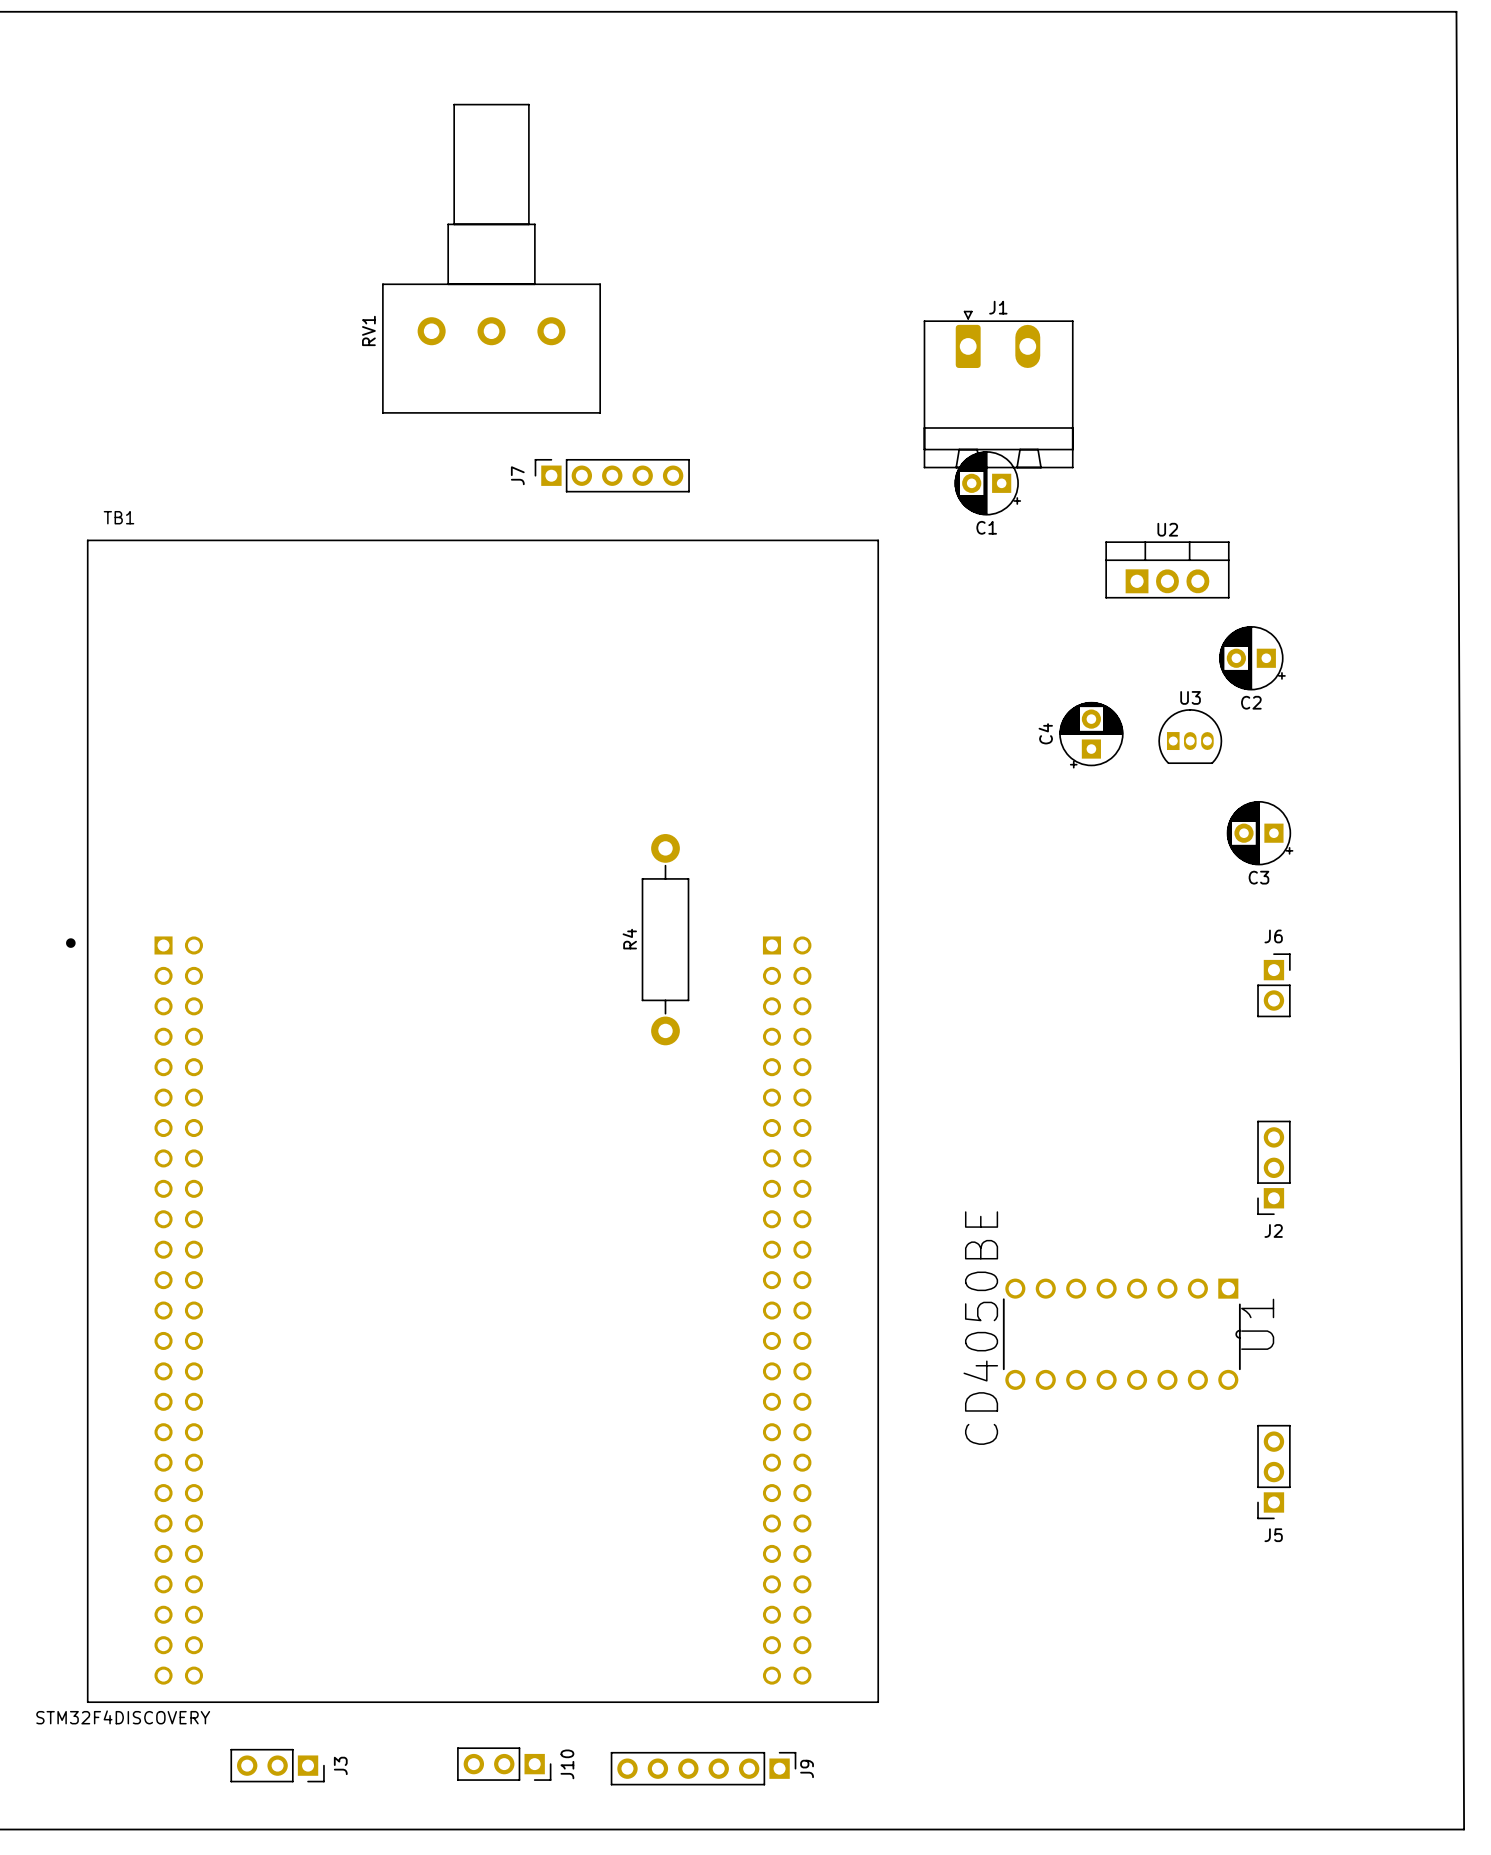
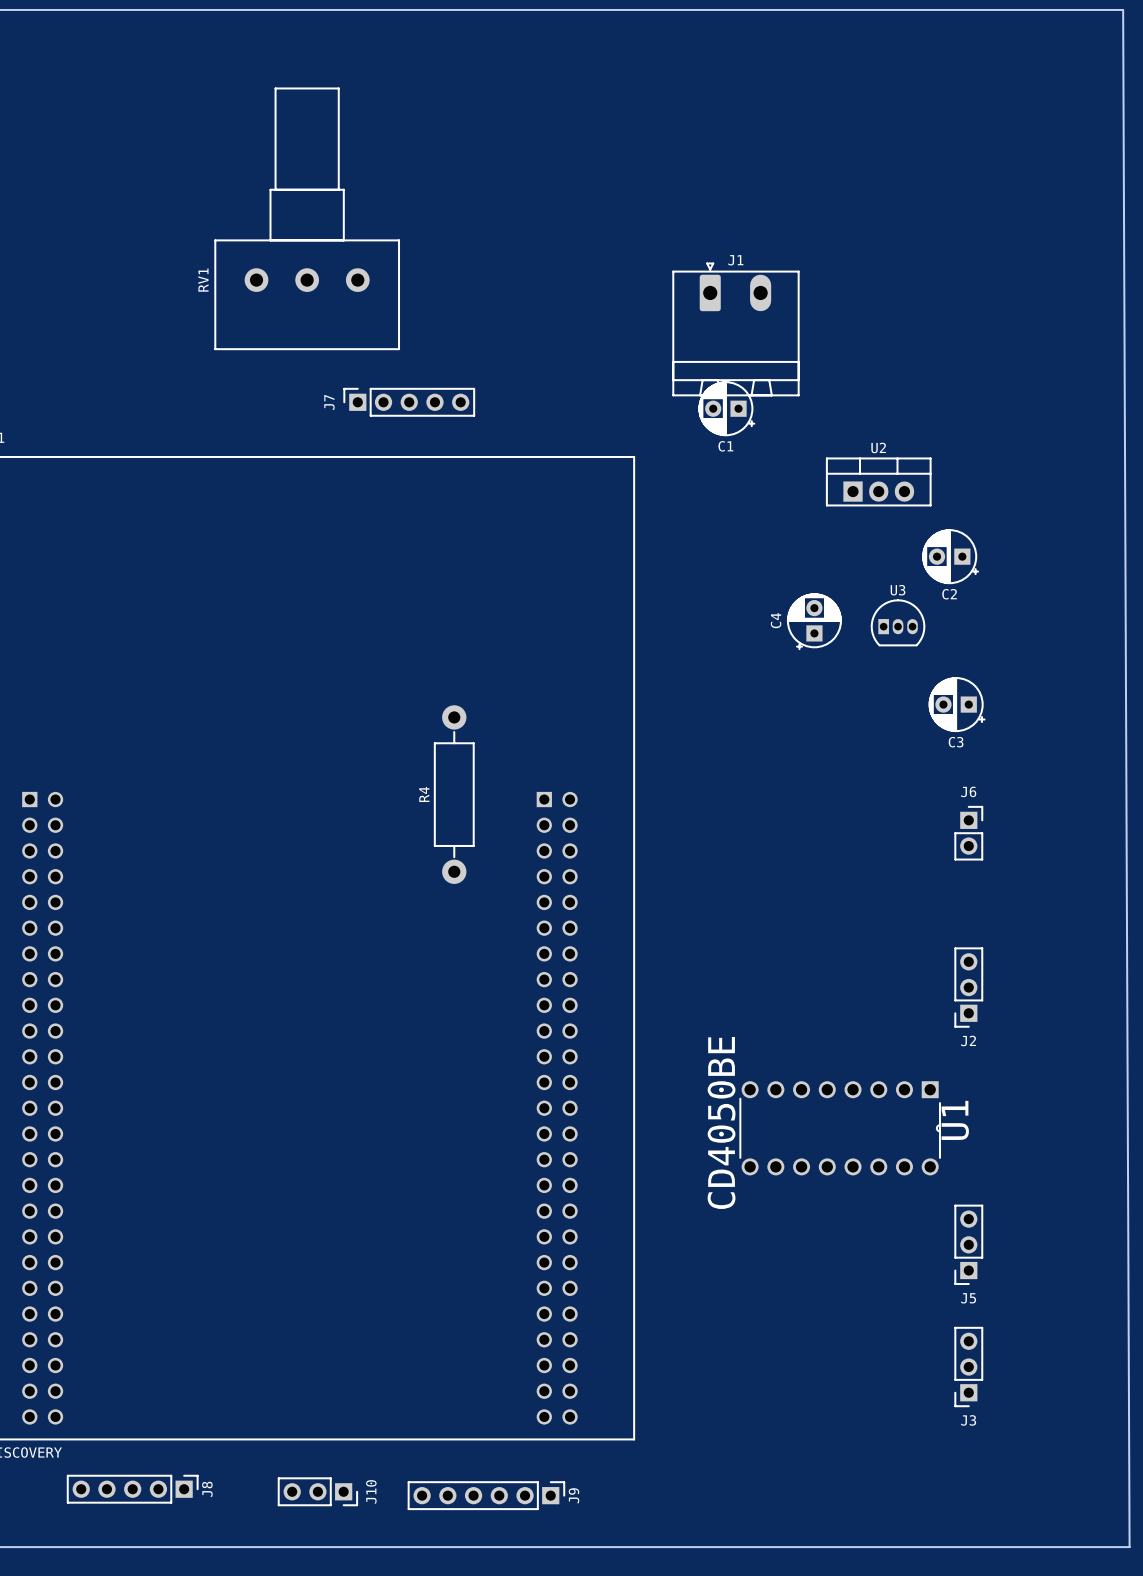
J8: none -> (132, 1489)
J3 rotation: 0° (277, 1765) -> 90° clockwise (968, 1367)
J3 position: (277, 1765) -> (968, 1367)

